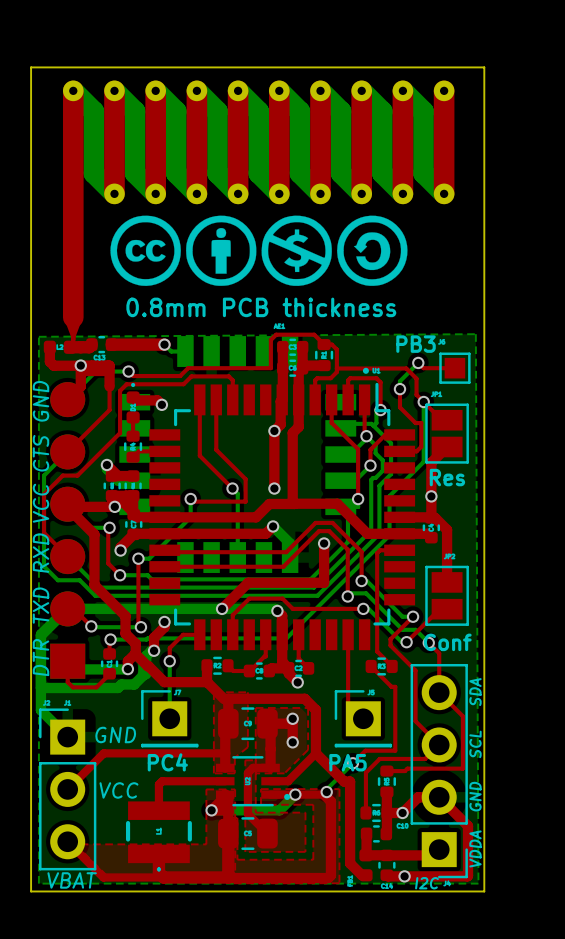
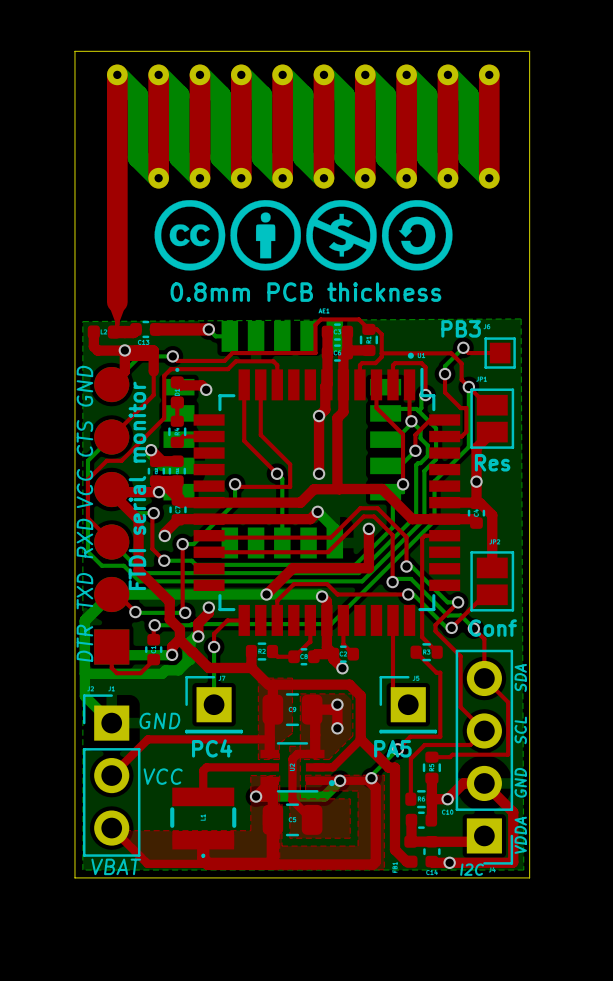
text: none -> FTDI serial monitor (137, 485)

